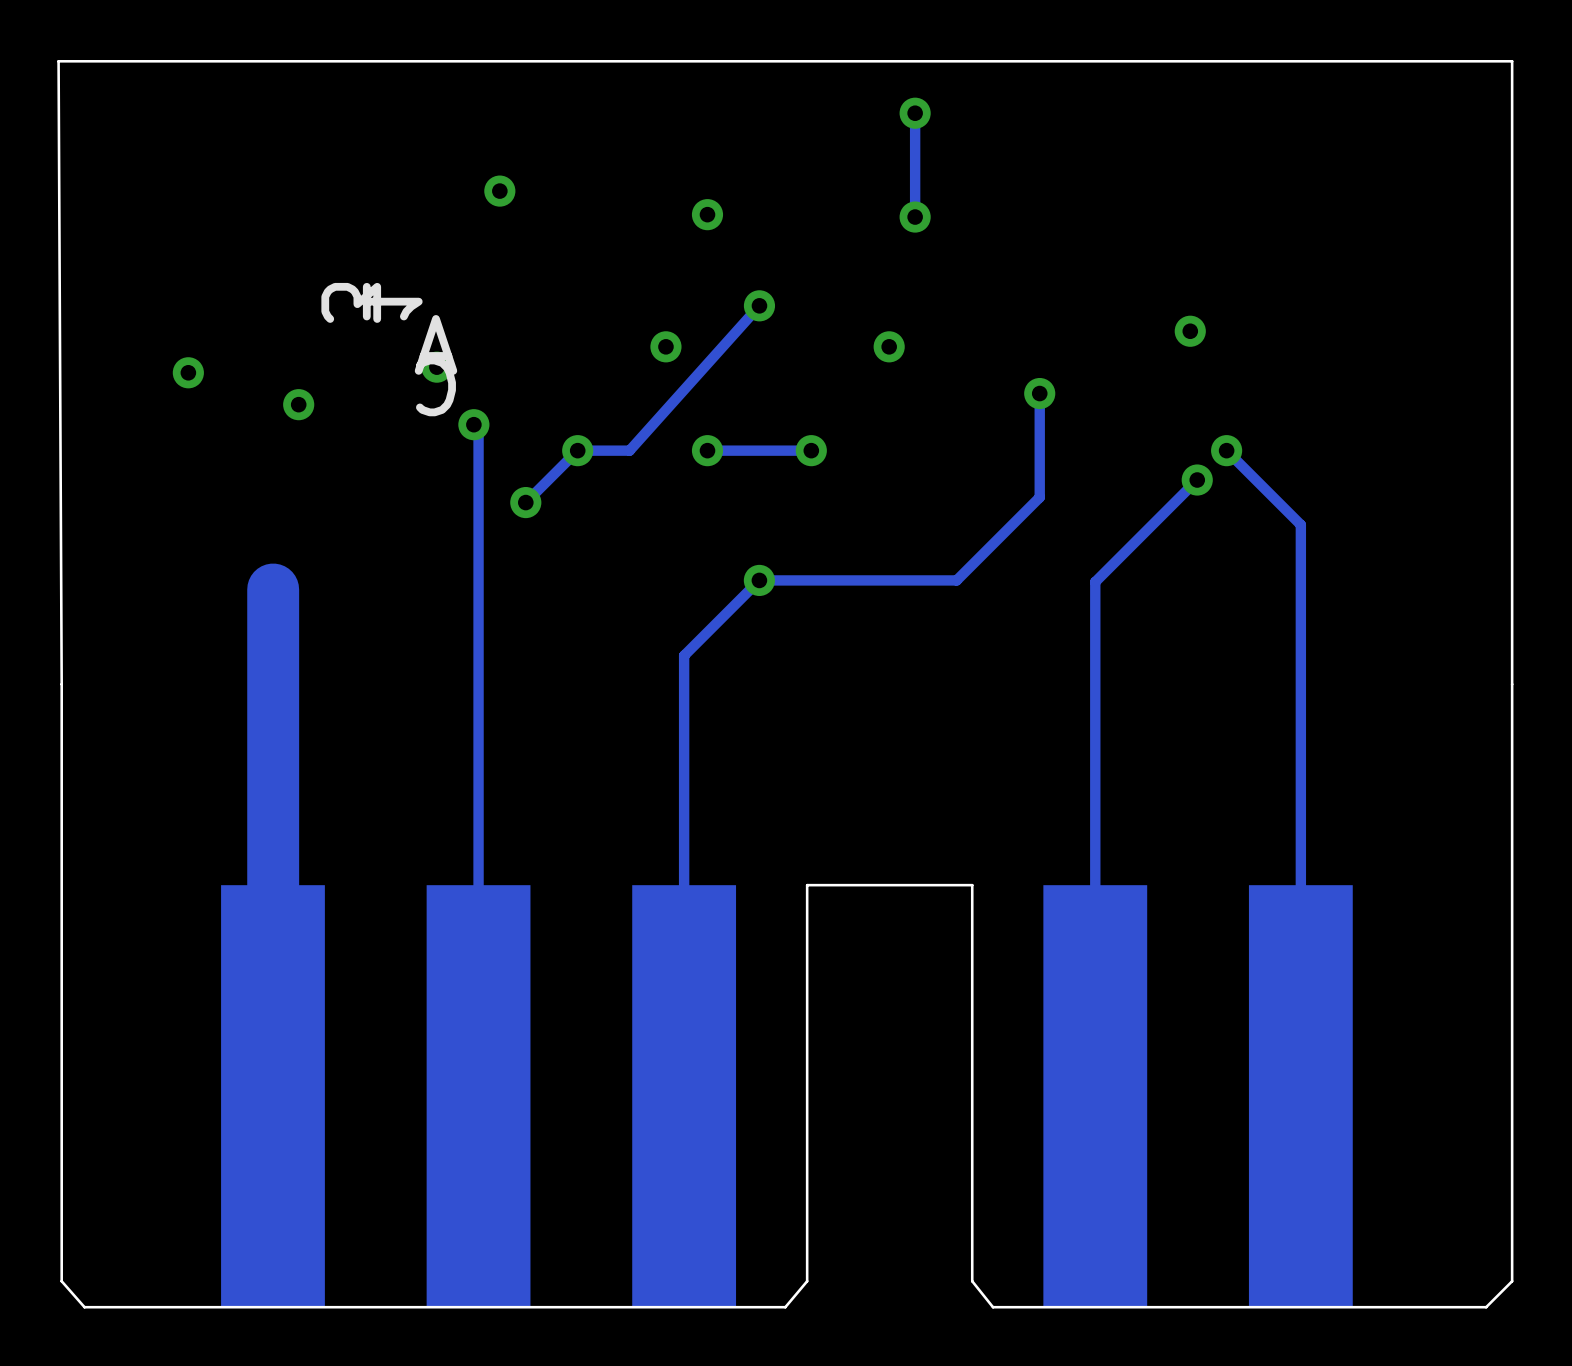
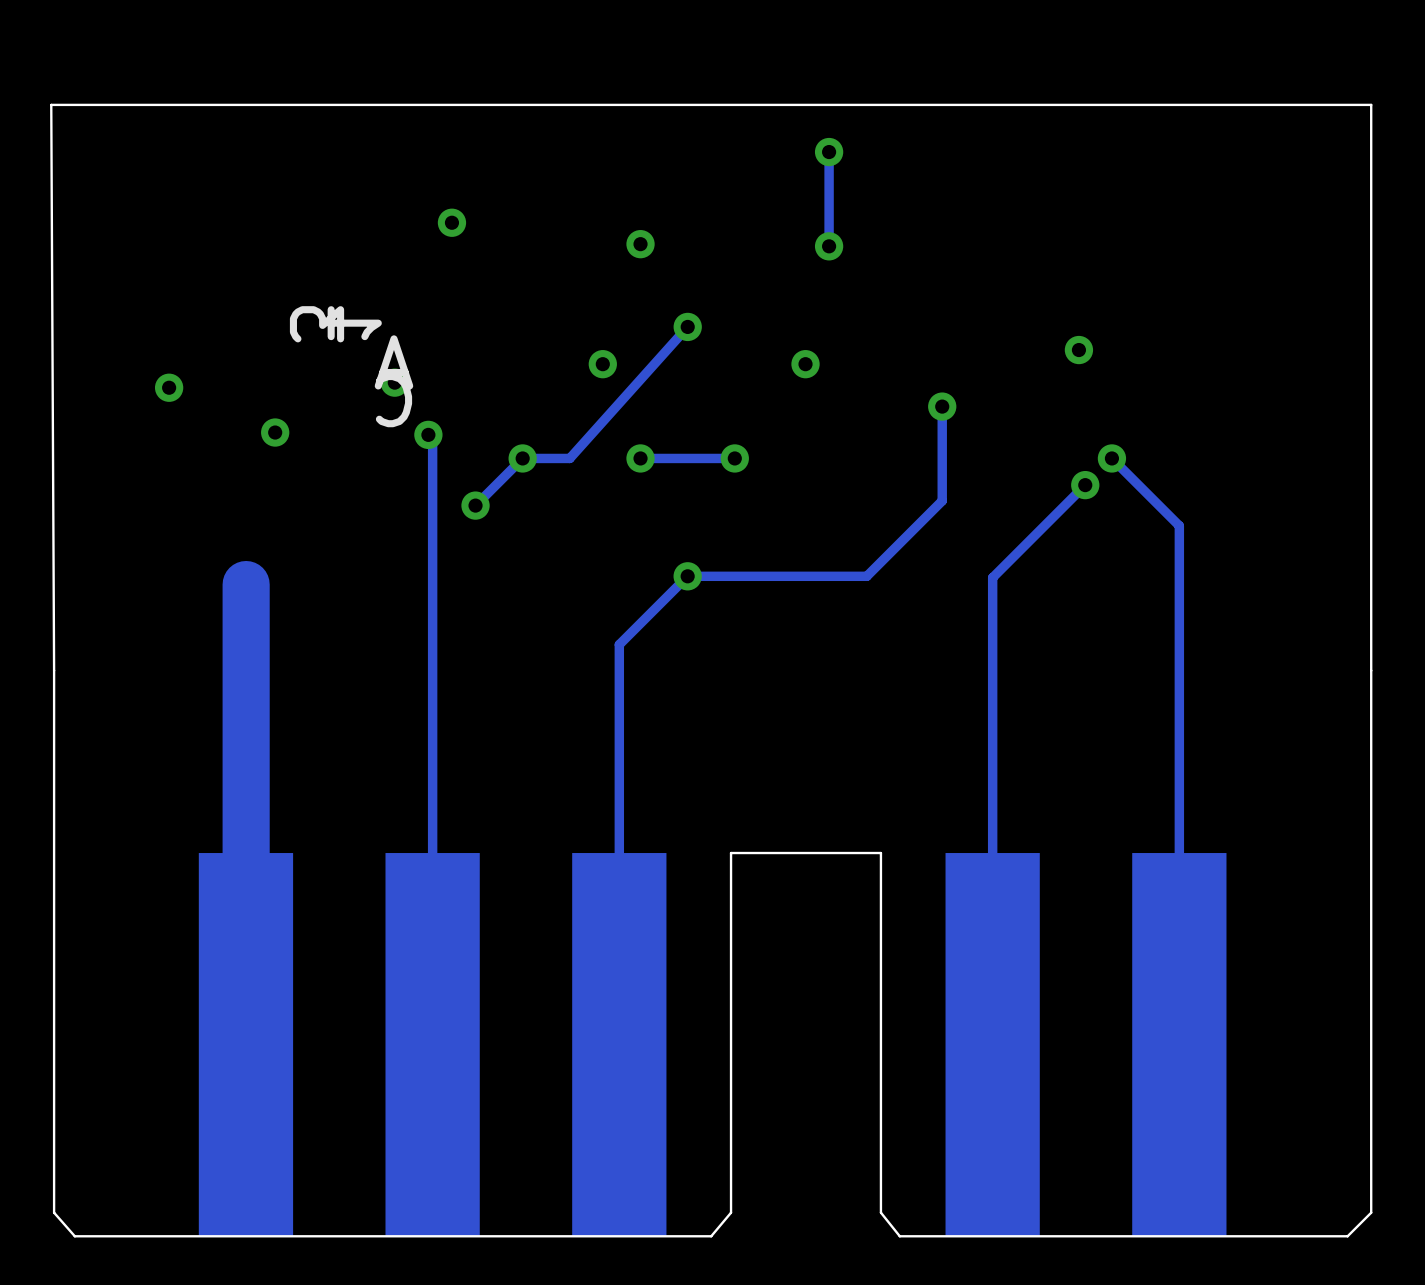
via position: (298, 404) -> (275, 432)

